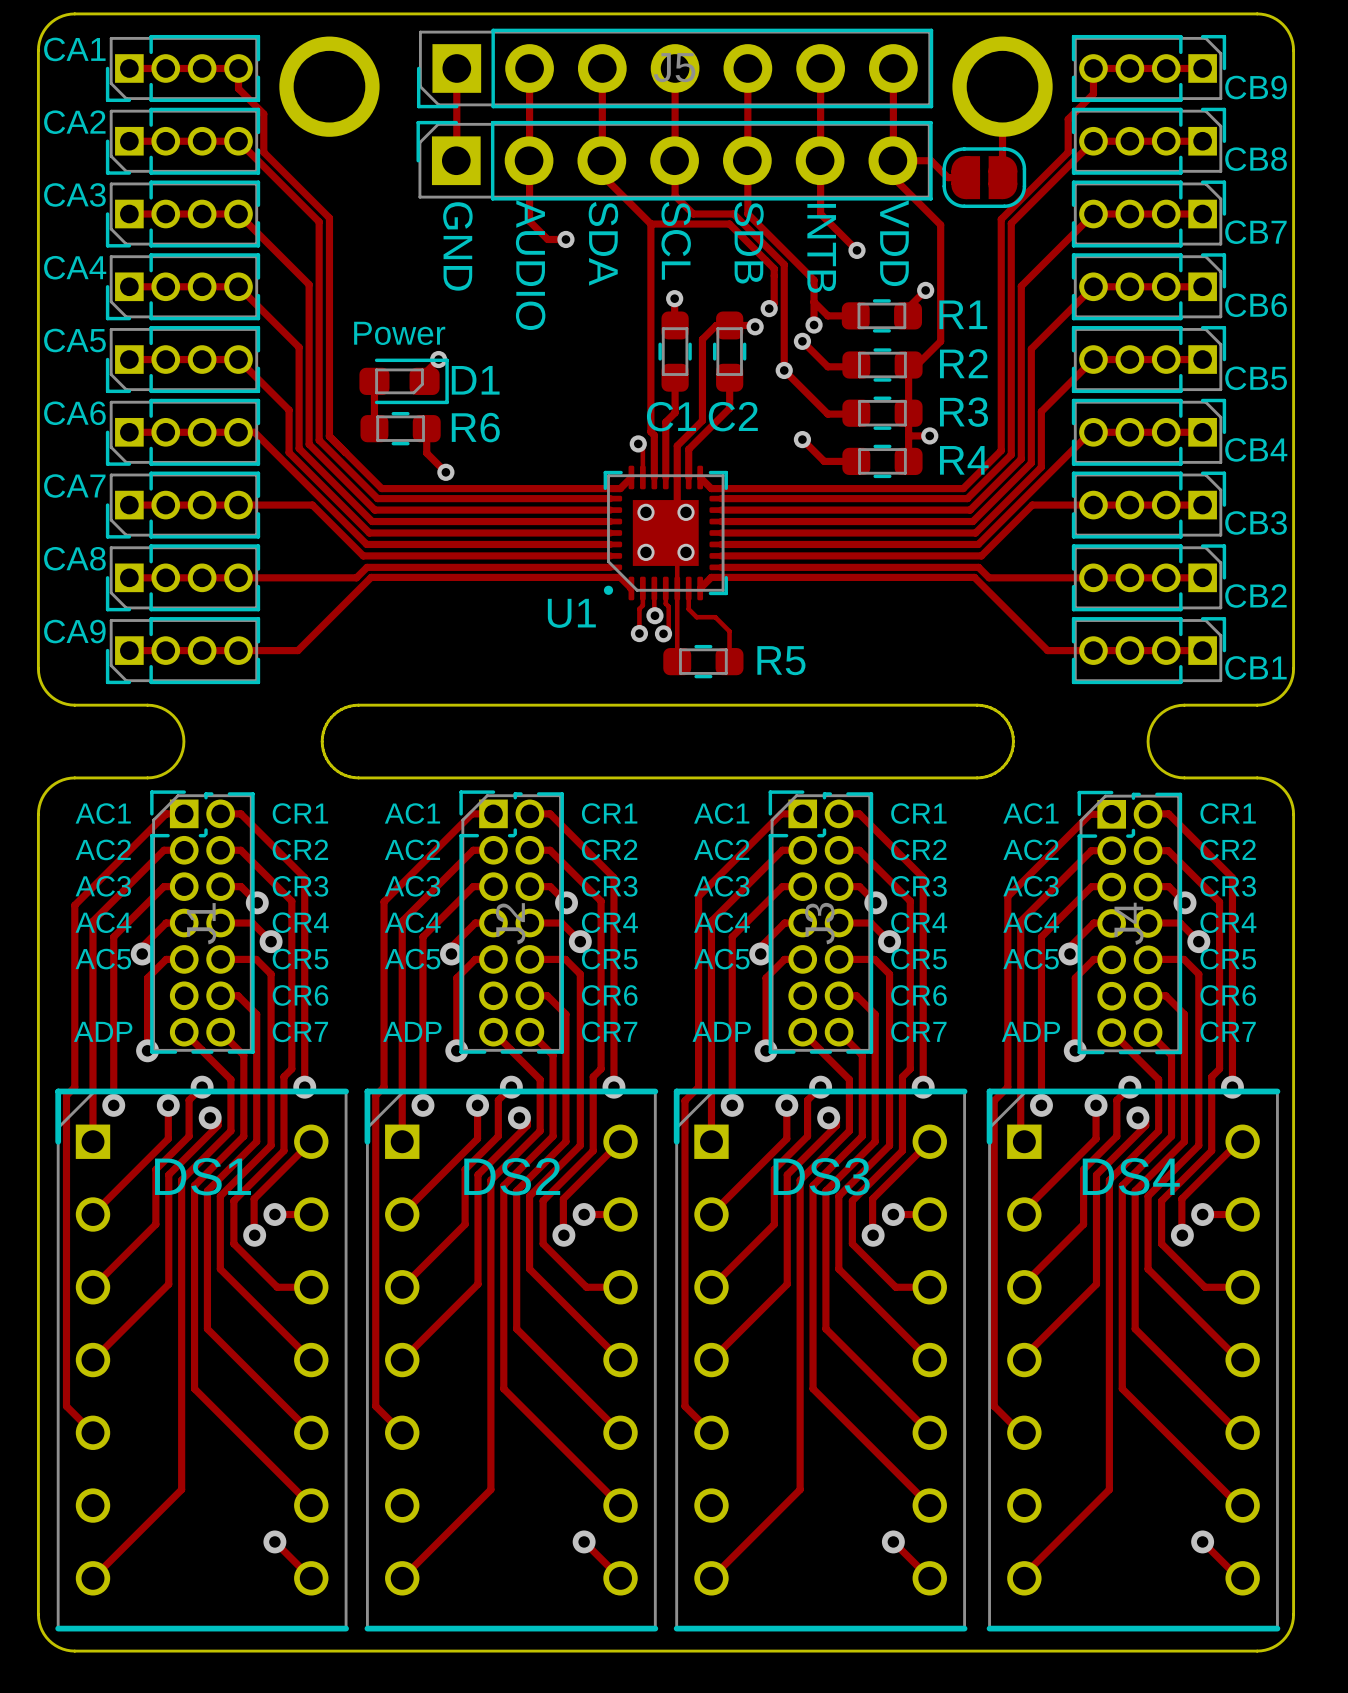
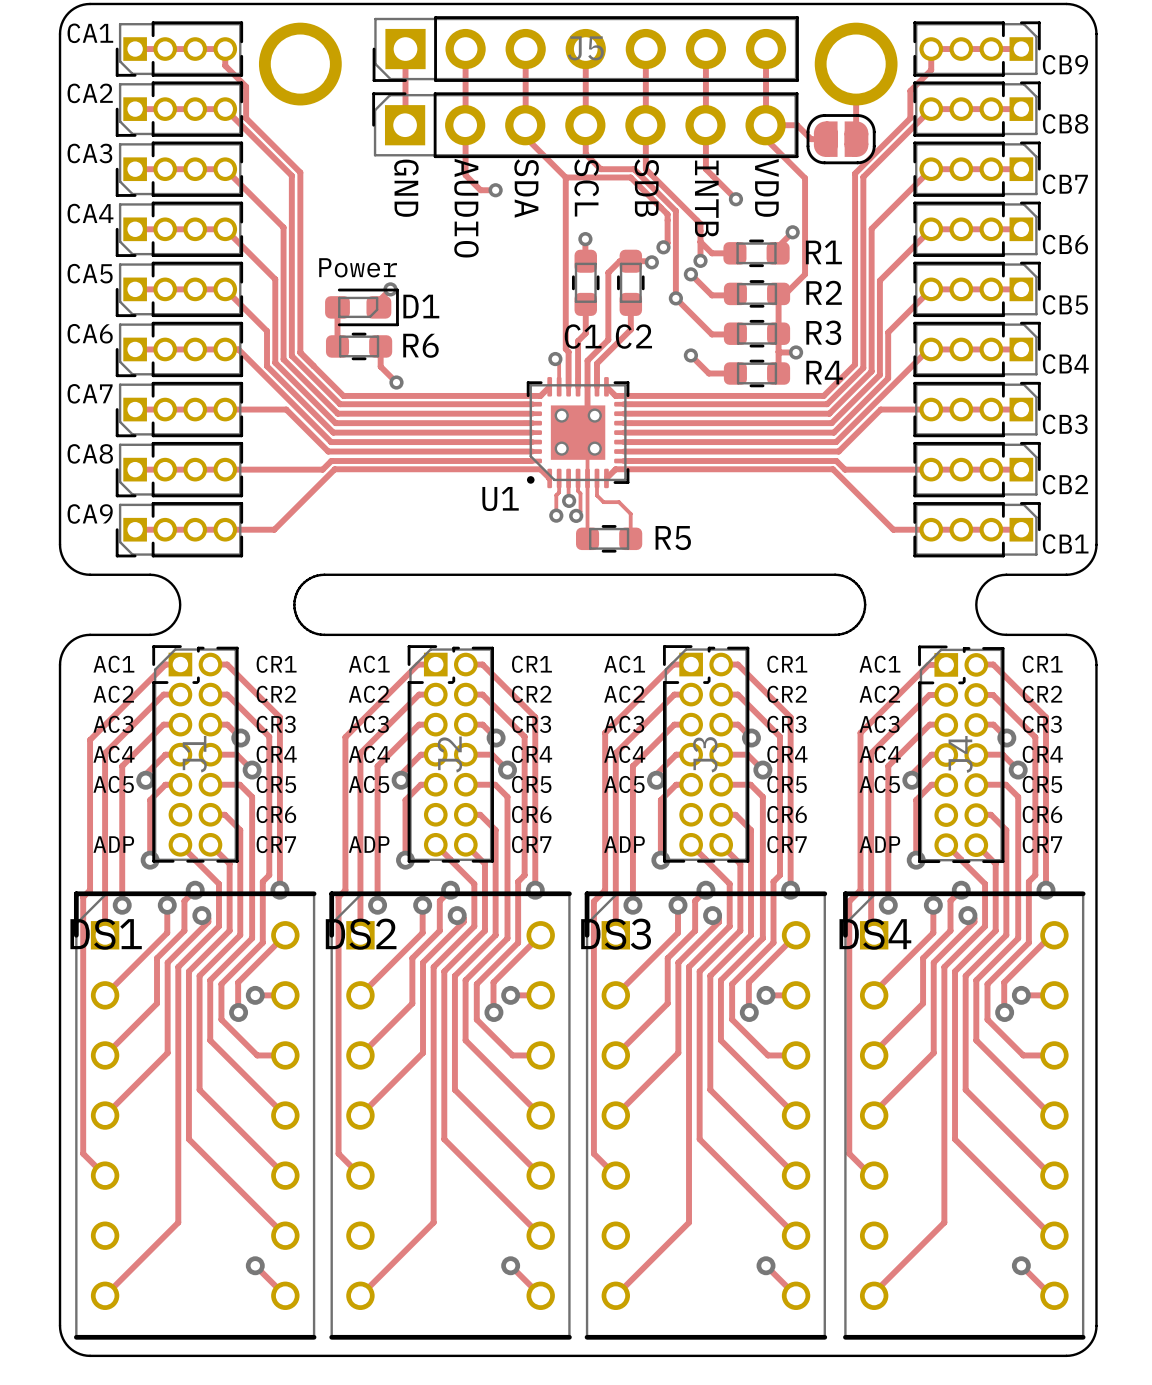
DS1 name position: DS1 (203, 1176) -> DS1 (106, 934)
DS2 name position: DS2 (512, 1176) -> DS2 (361, 934)
DS3 name position: DS3 (821, 1176) -> DS3 (616, 934)
DS4 name position: DS4 (1131, 1176) -> DS4 (875, 934)

